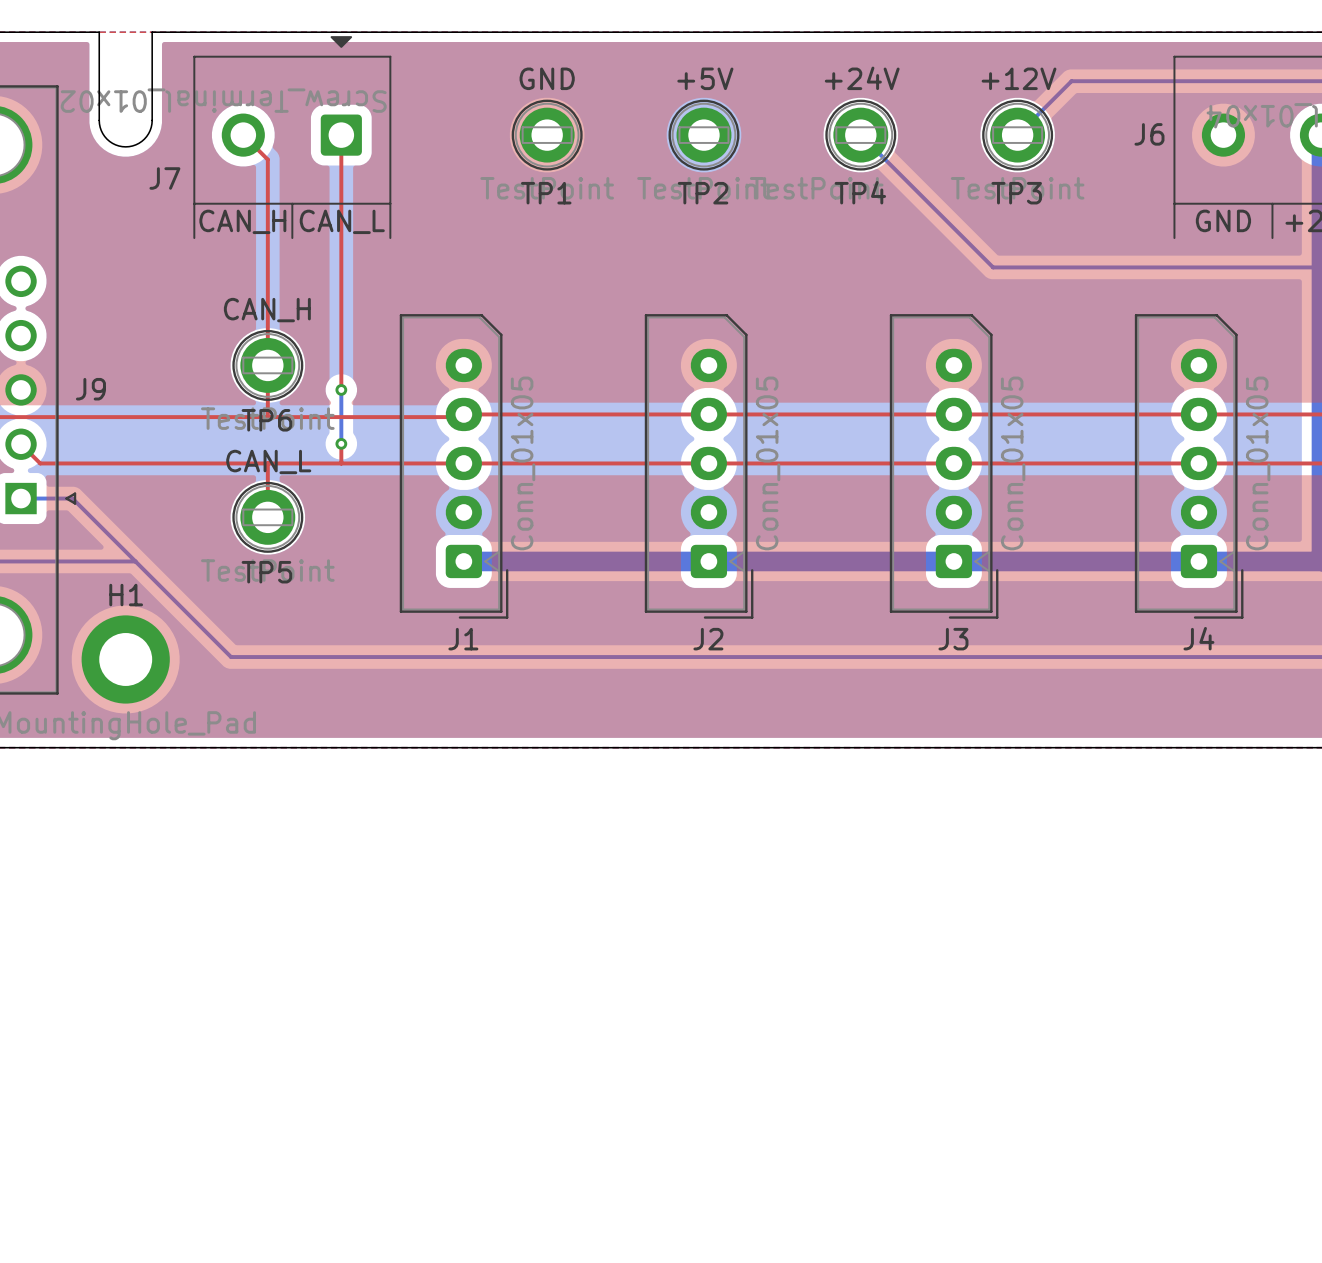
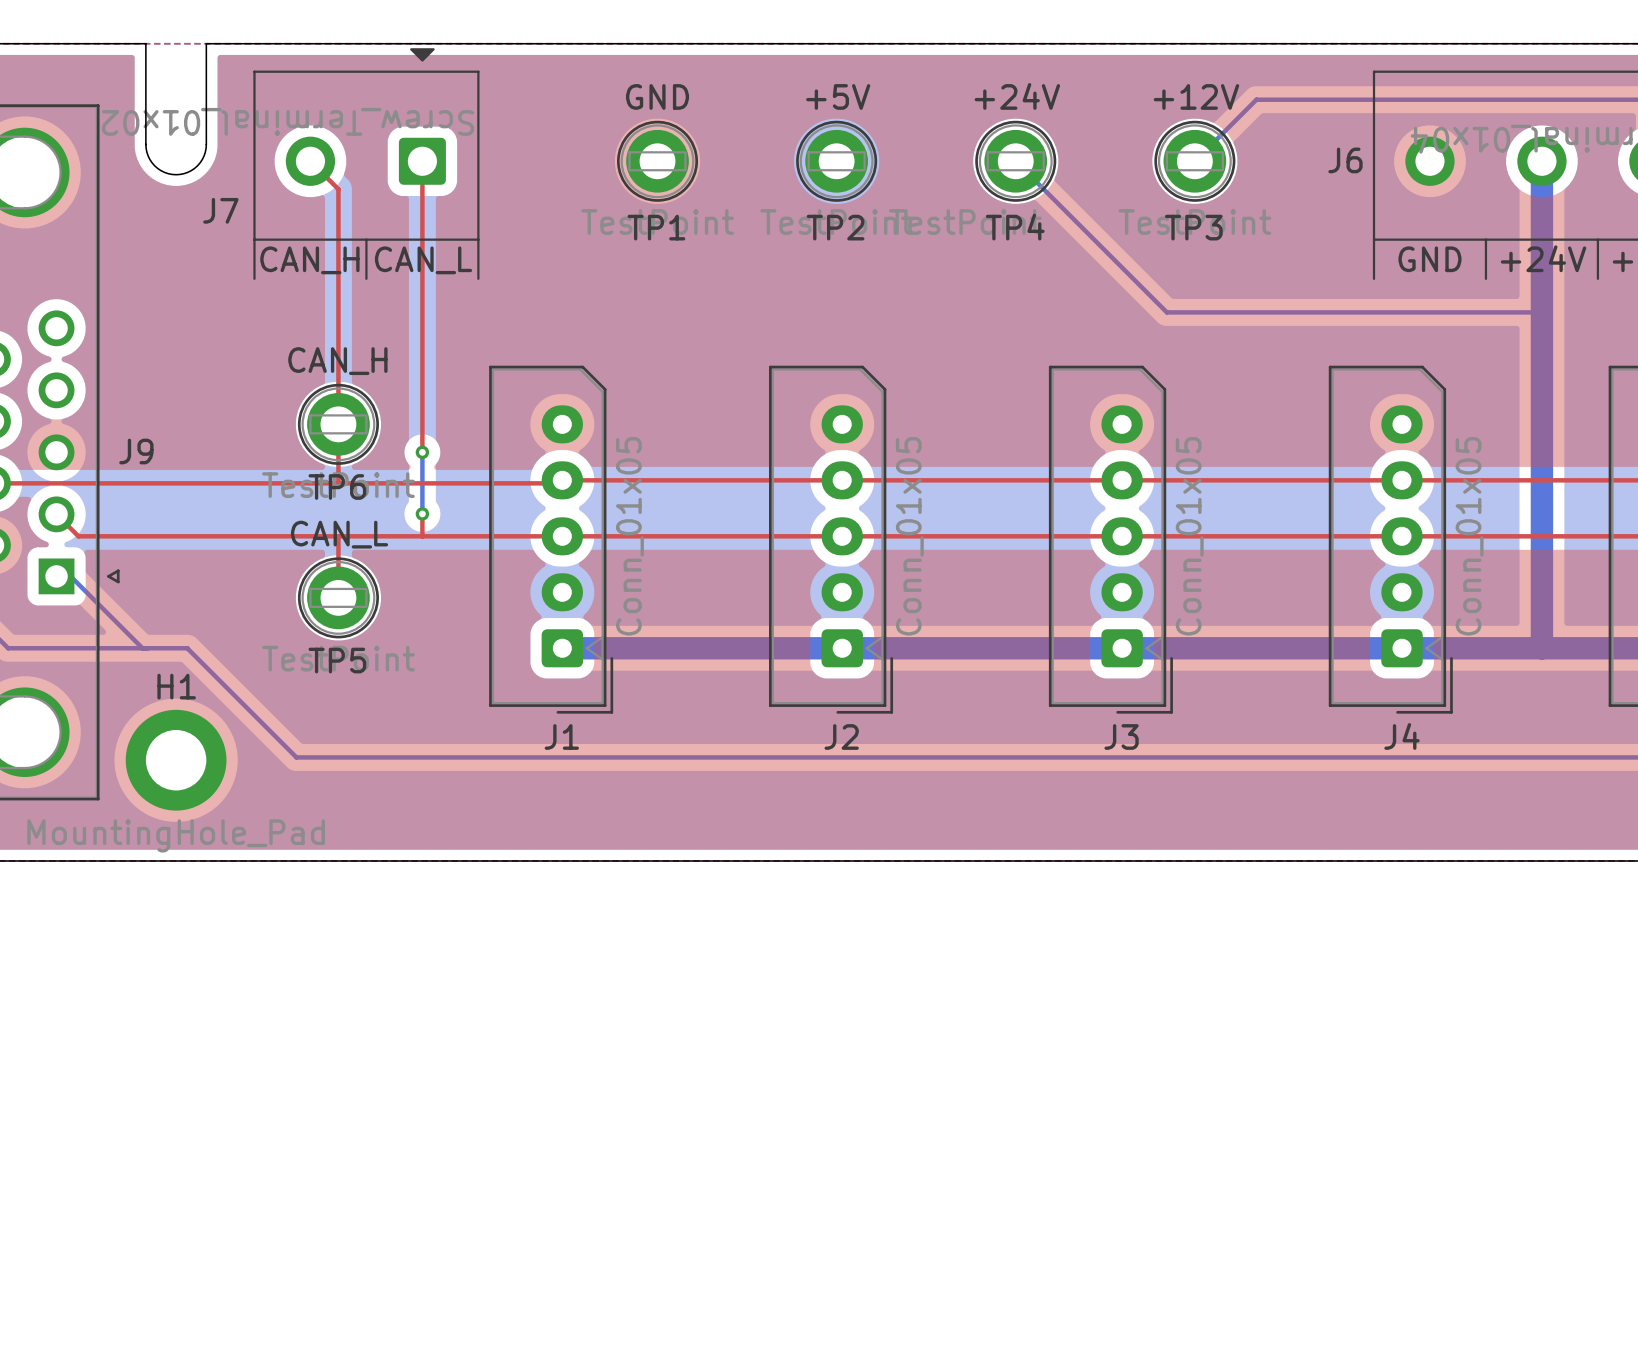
bottom track: (33, 498) (72, 498) (135, 561) -> (70, 576) (142, 648)

